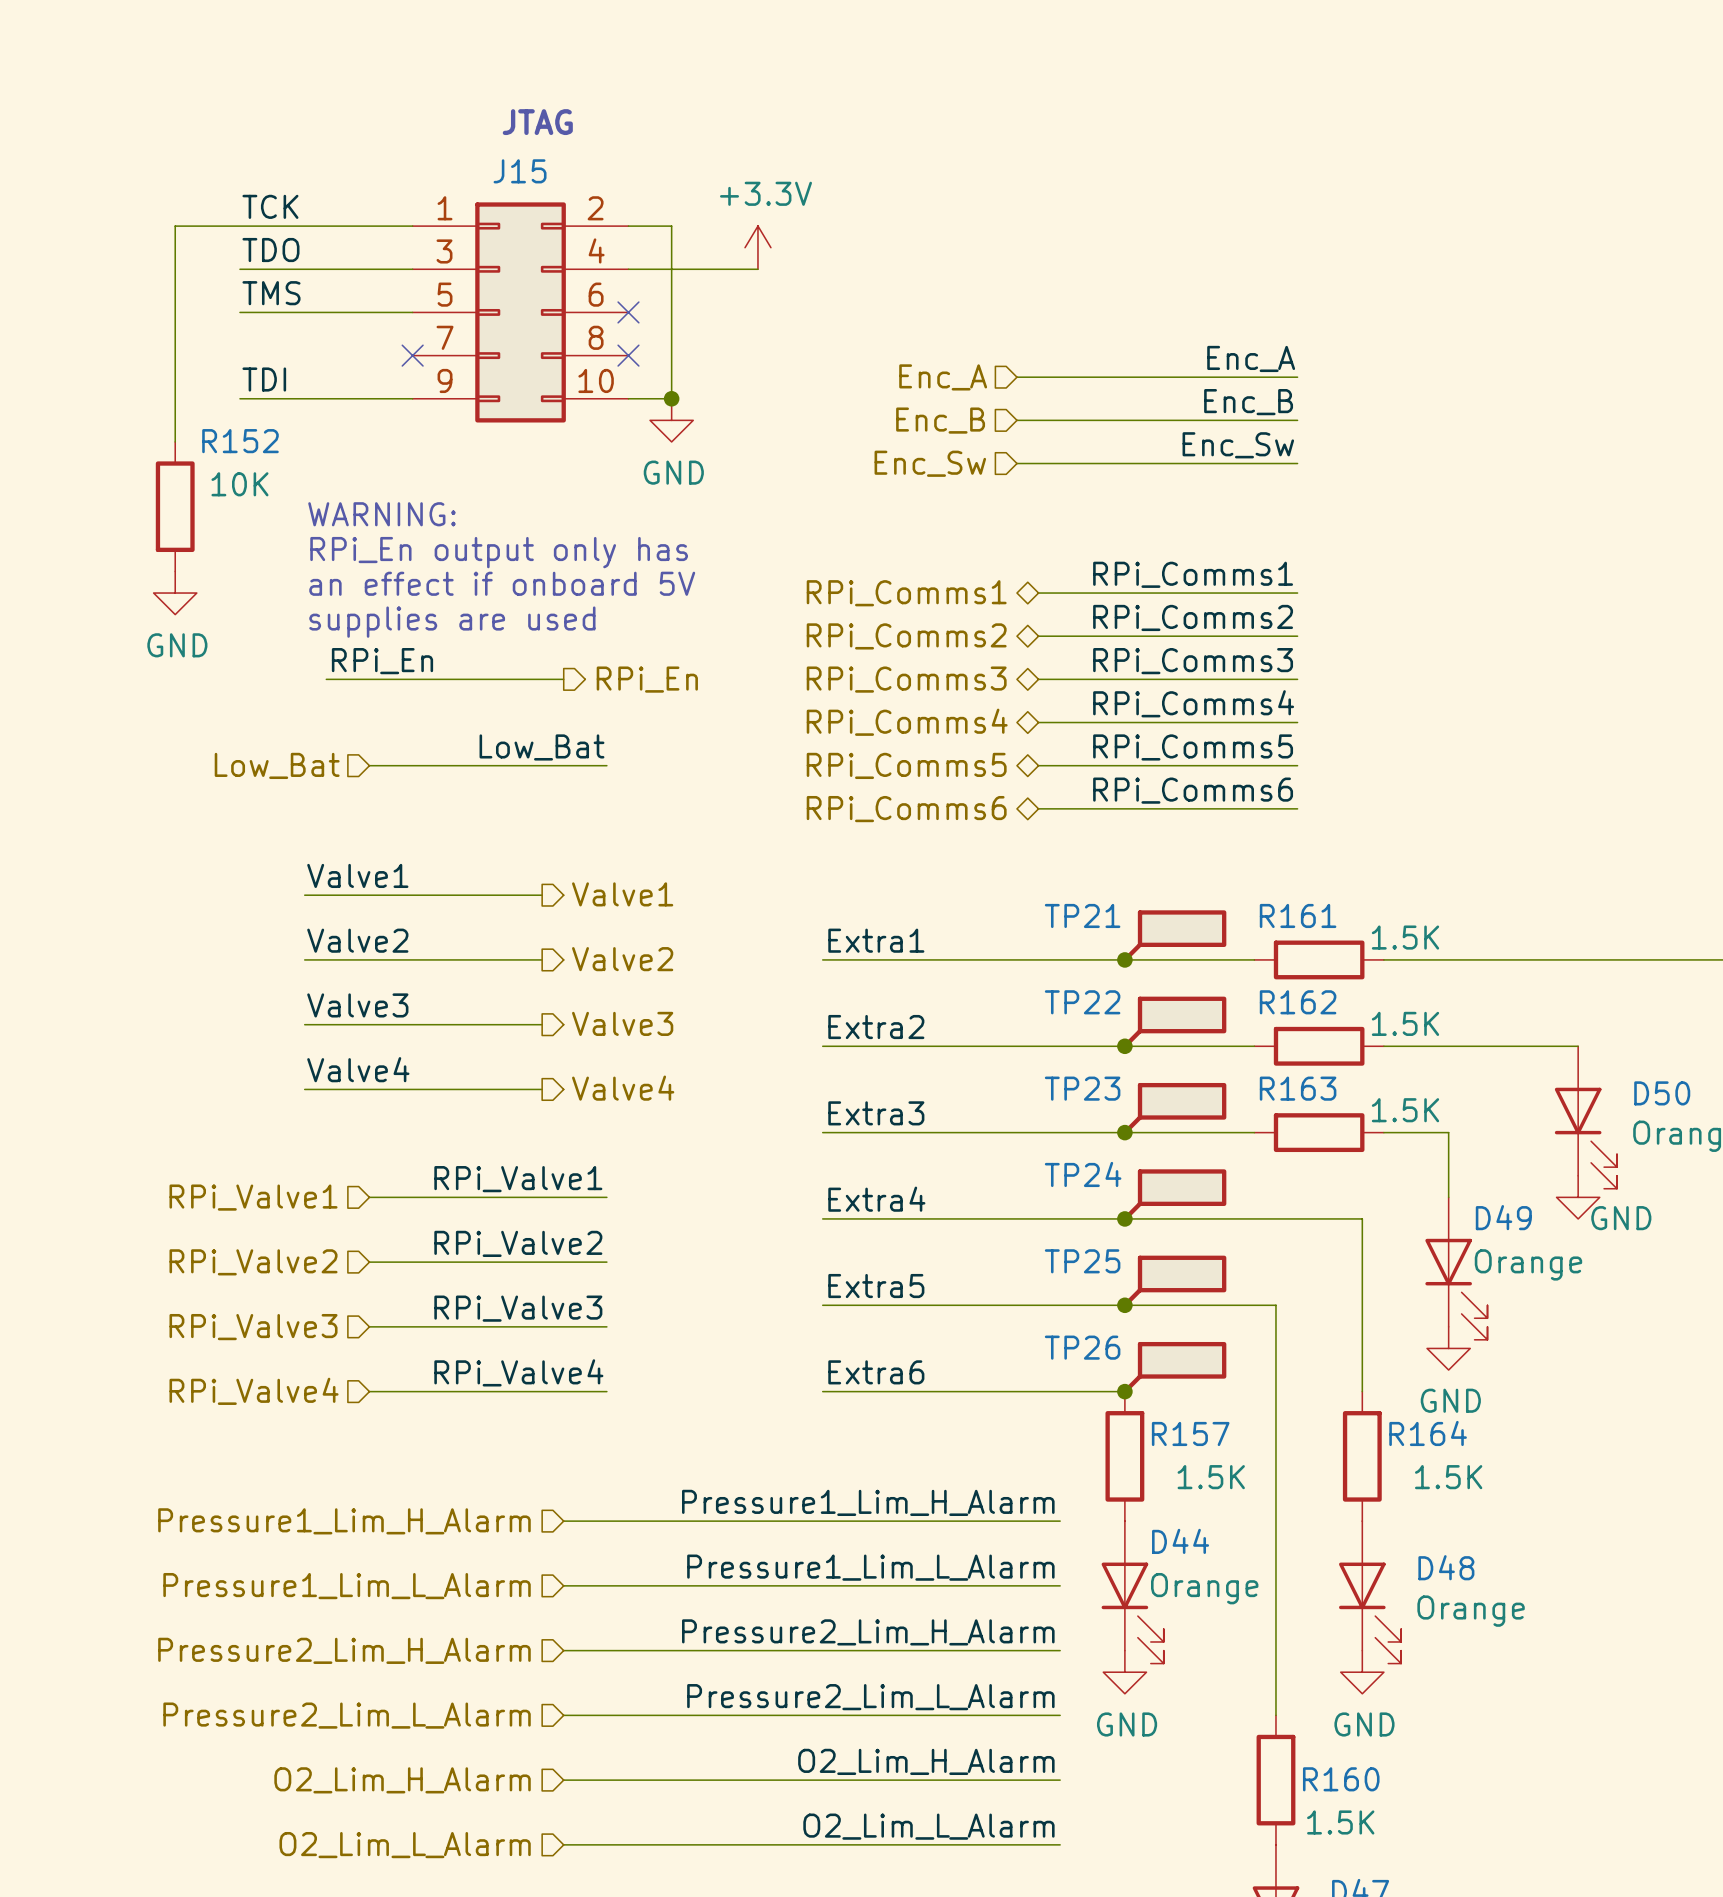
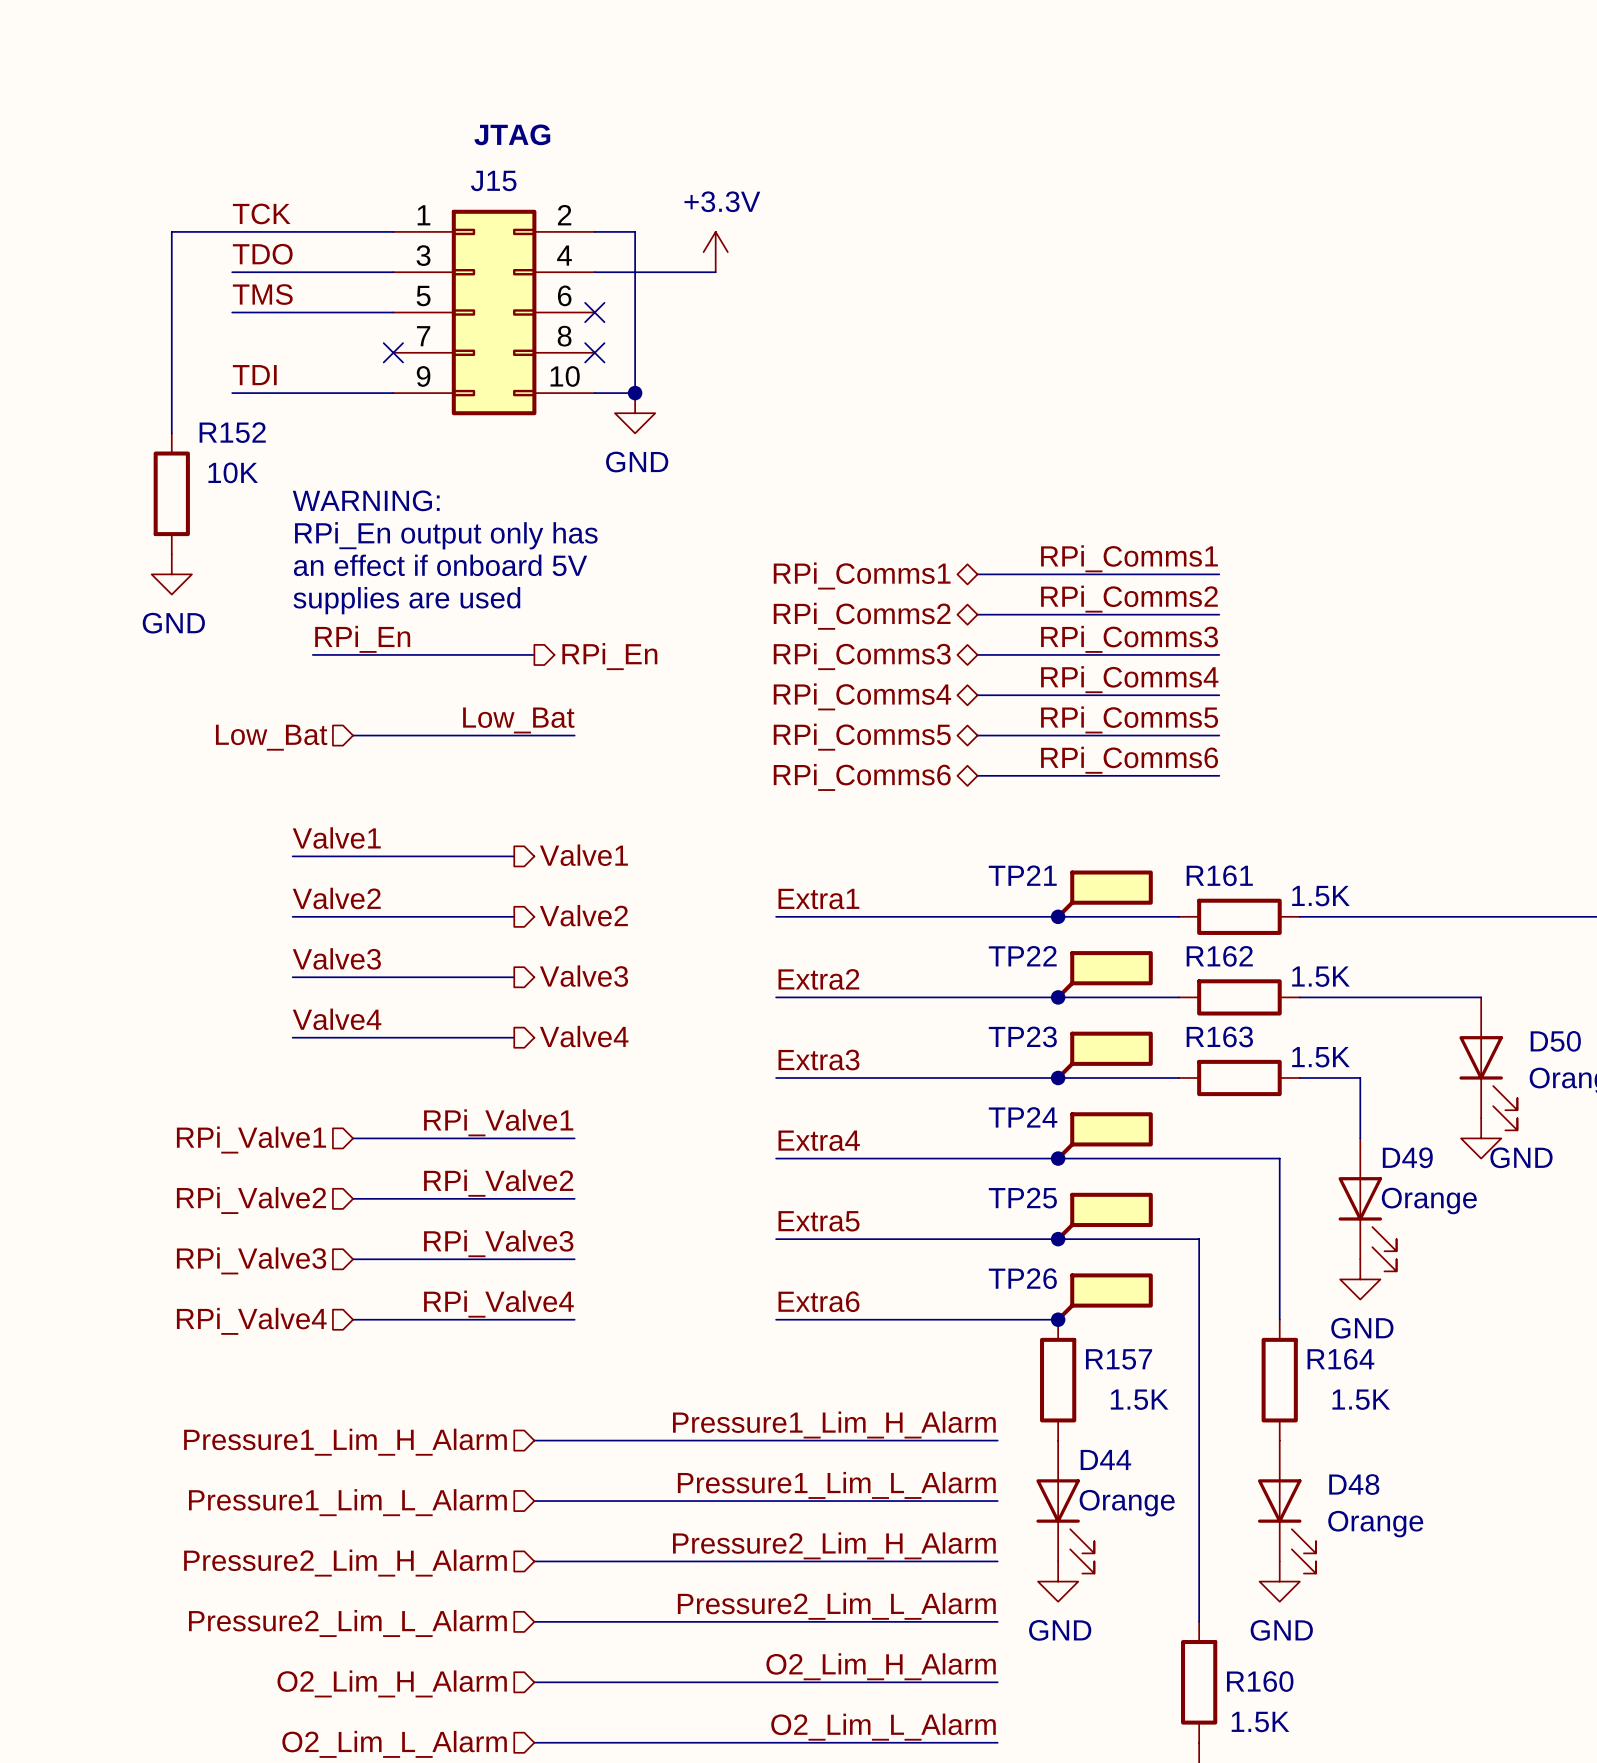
label: Enc_A (1251, 358) -> none
hierarchical label: Enc_A (943, 377) -> none
wire: (1016, 377) (1297, 377) -> none
label: Enc_B (1248, 402) -> none
hierarchical label: Enc_B (940, 420) -> none
wire: (1016, 420) (1297, 420) -> none
label: Enc_Sw (1238, 445) -> none
hierarchical label: Enc_Sw (930, 463) -> none
wire: (1016, 463) (1297, 463) -> none

